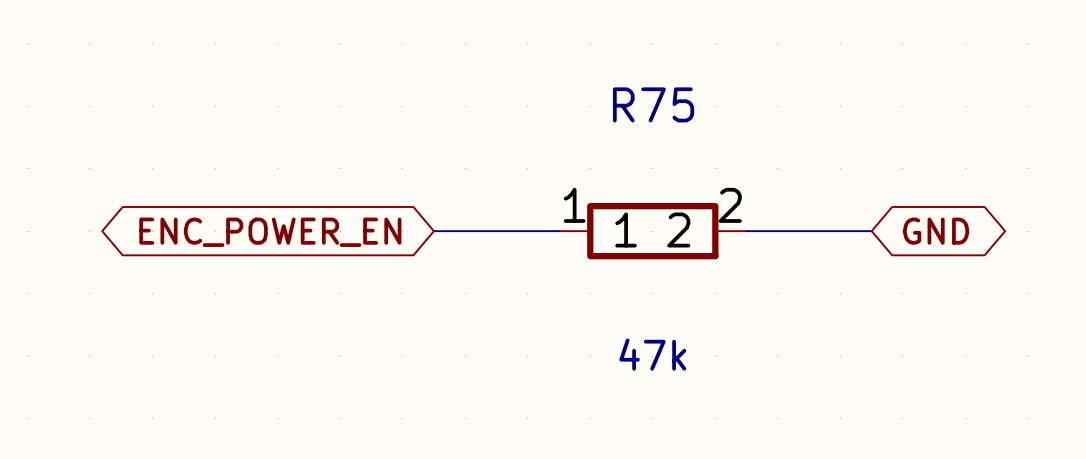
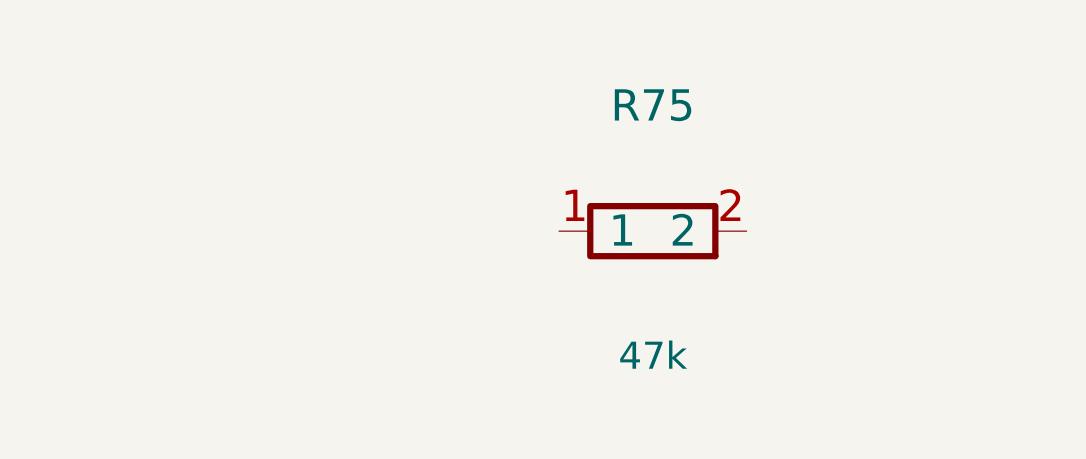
wire: (433, 231) (559, 231) -> none
wire: (746, 231) (871, 231) -> none
global label: GND (936, 231) -> none
global label: ENC_POWER_EN (270, 232) -> none

